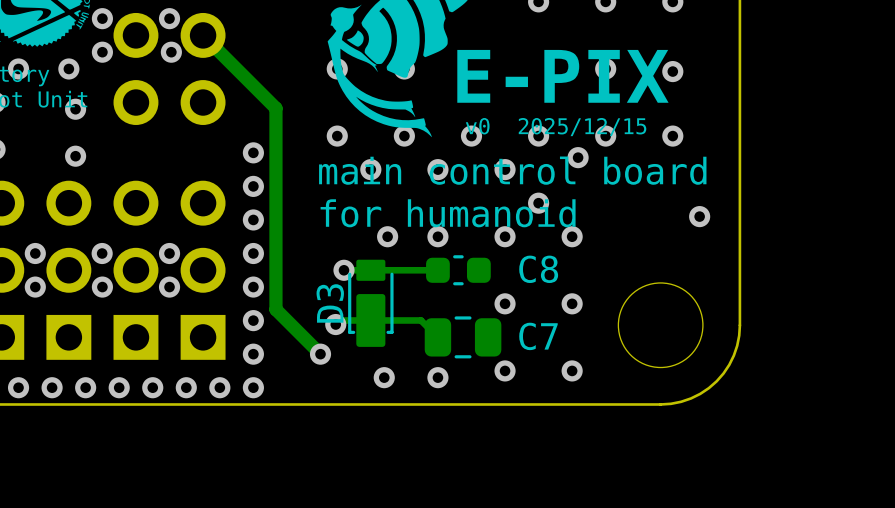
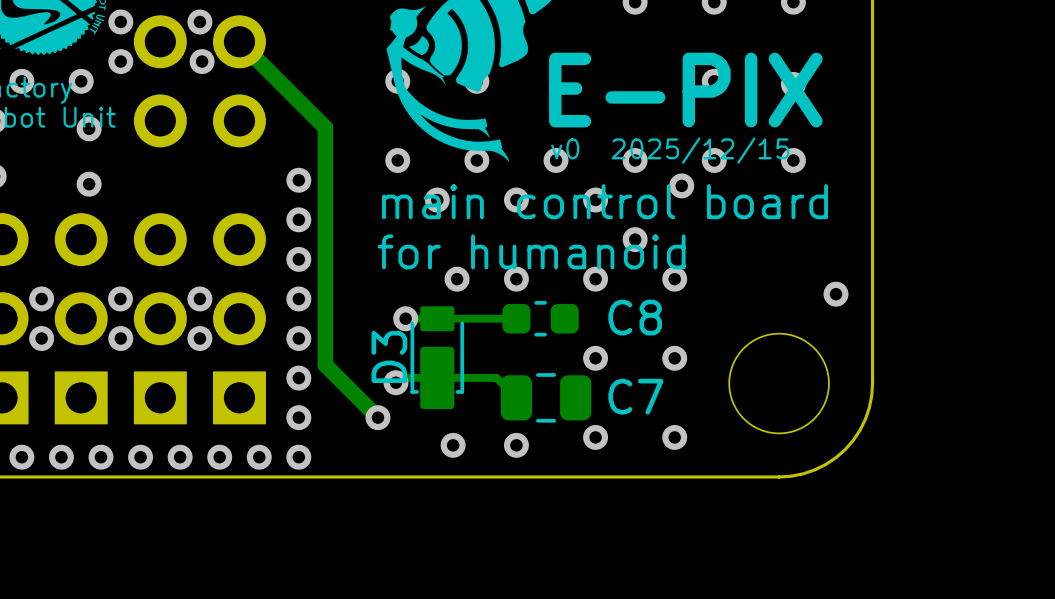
via position: (699, 216) -> (836, 294)

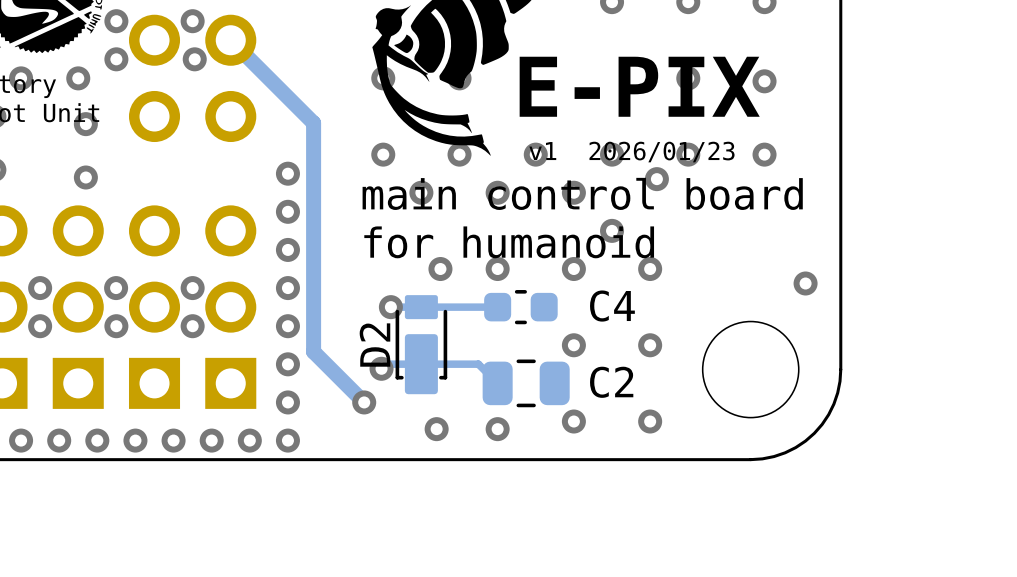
text: v0 2025/12/15 (670, 150) -> v1 2026/01/23 (631, 152)
C8 name: C8 (635, 317) -> C4 (612, 306)
D3 name: D3 (389, 356) -> D2 (374, 345)
C7 name: C7 (635, 396) -> C2 (611, 382)

